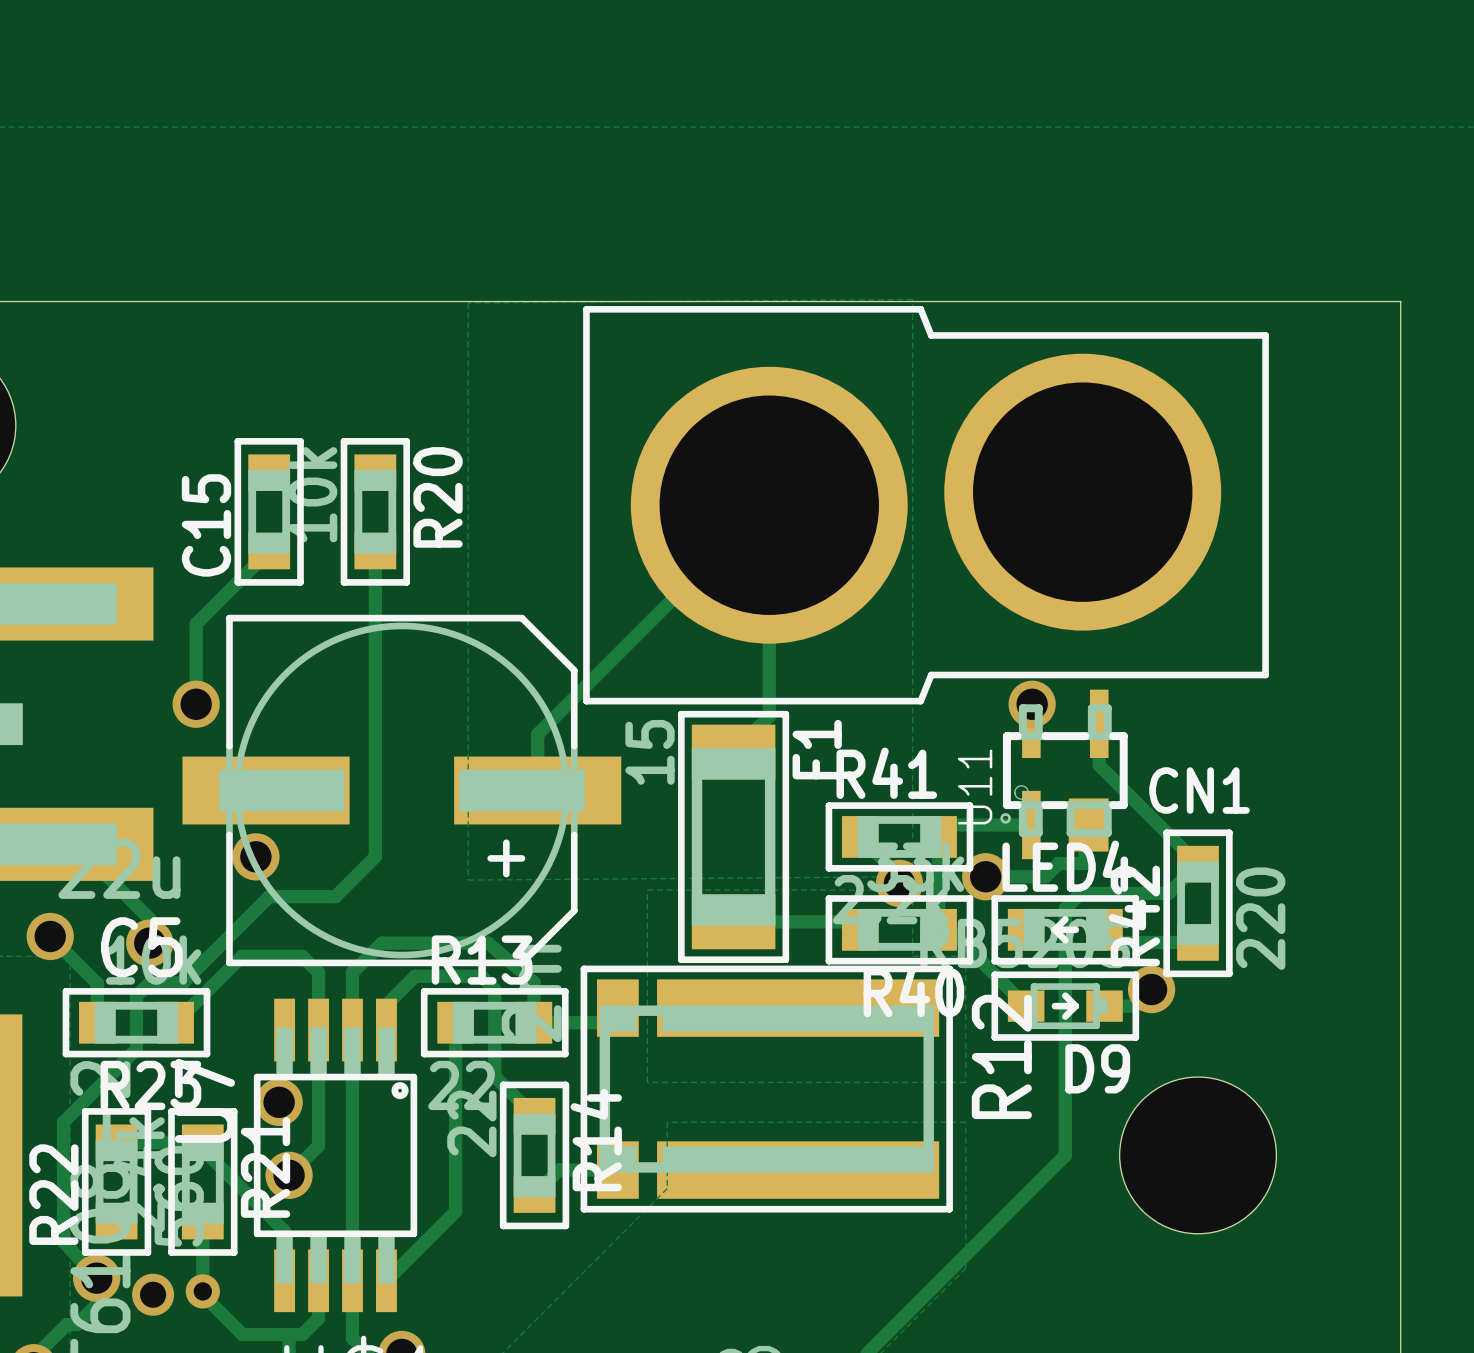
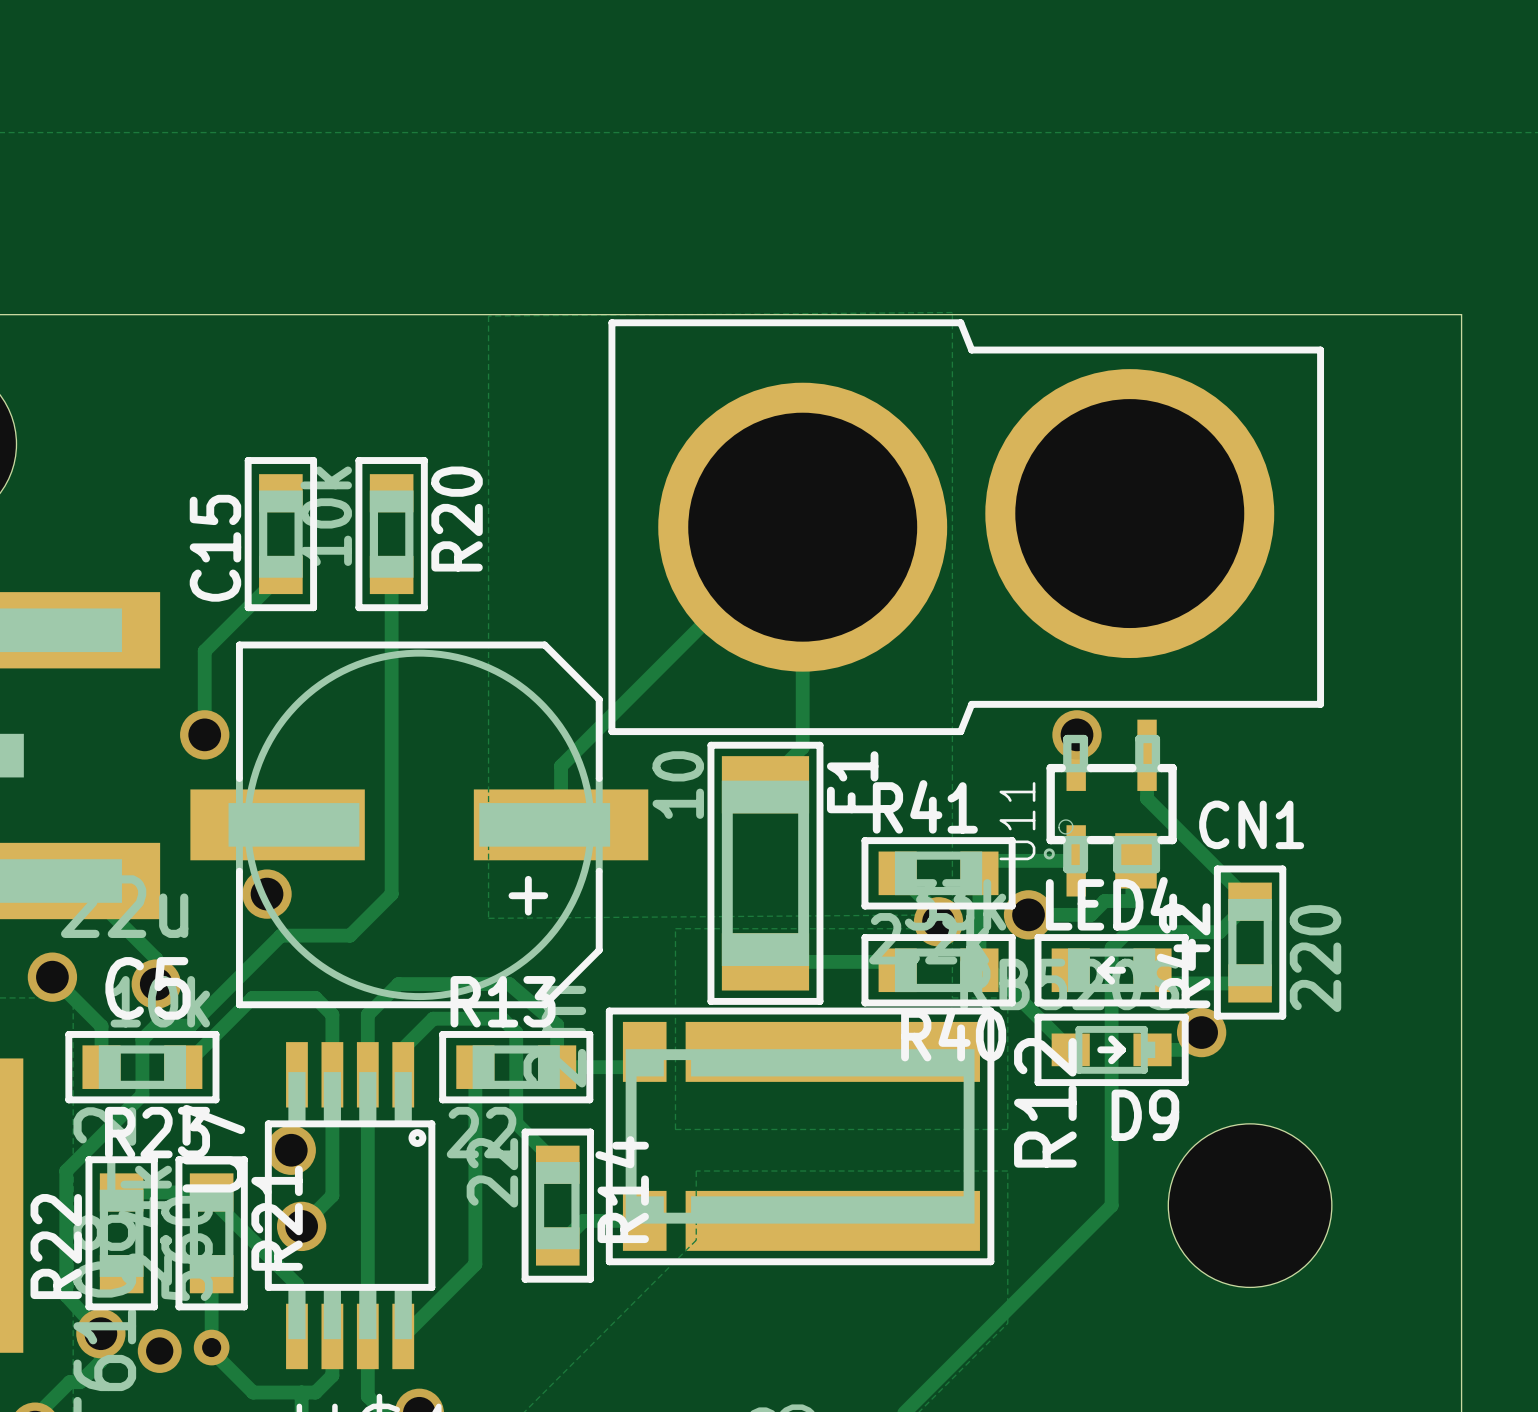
F1 value: 15 (650, 752) -> 10 (678, 785)

